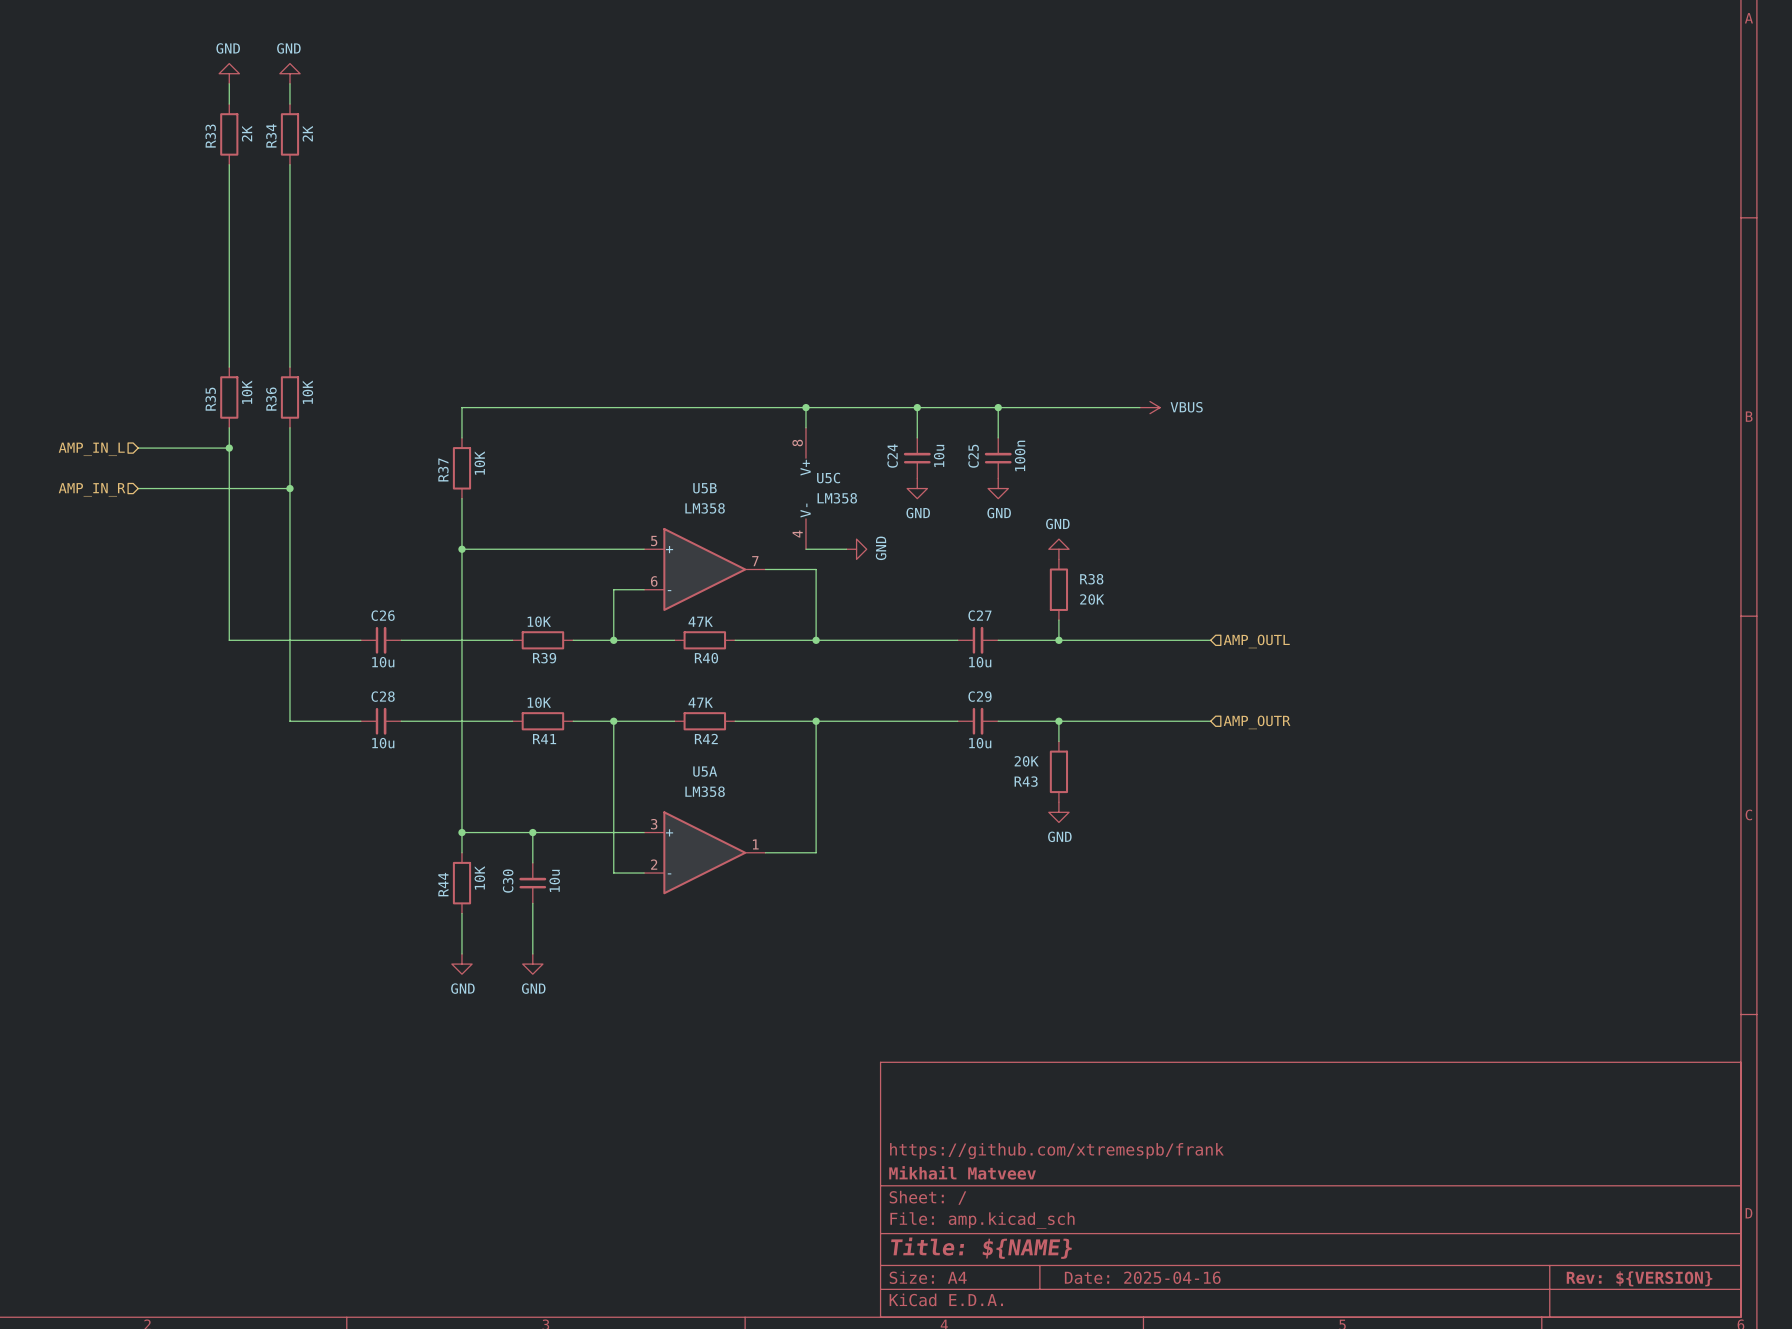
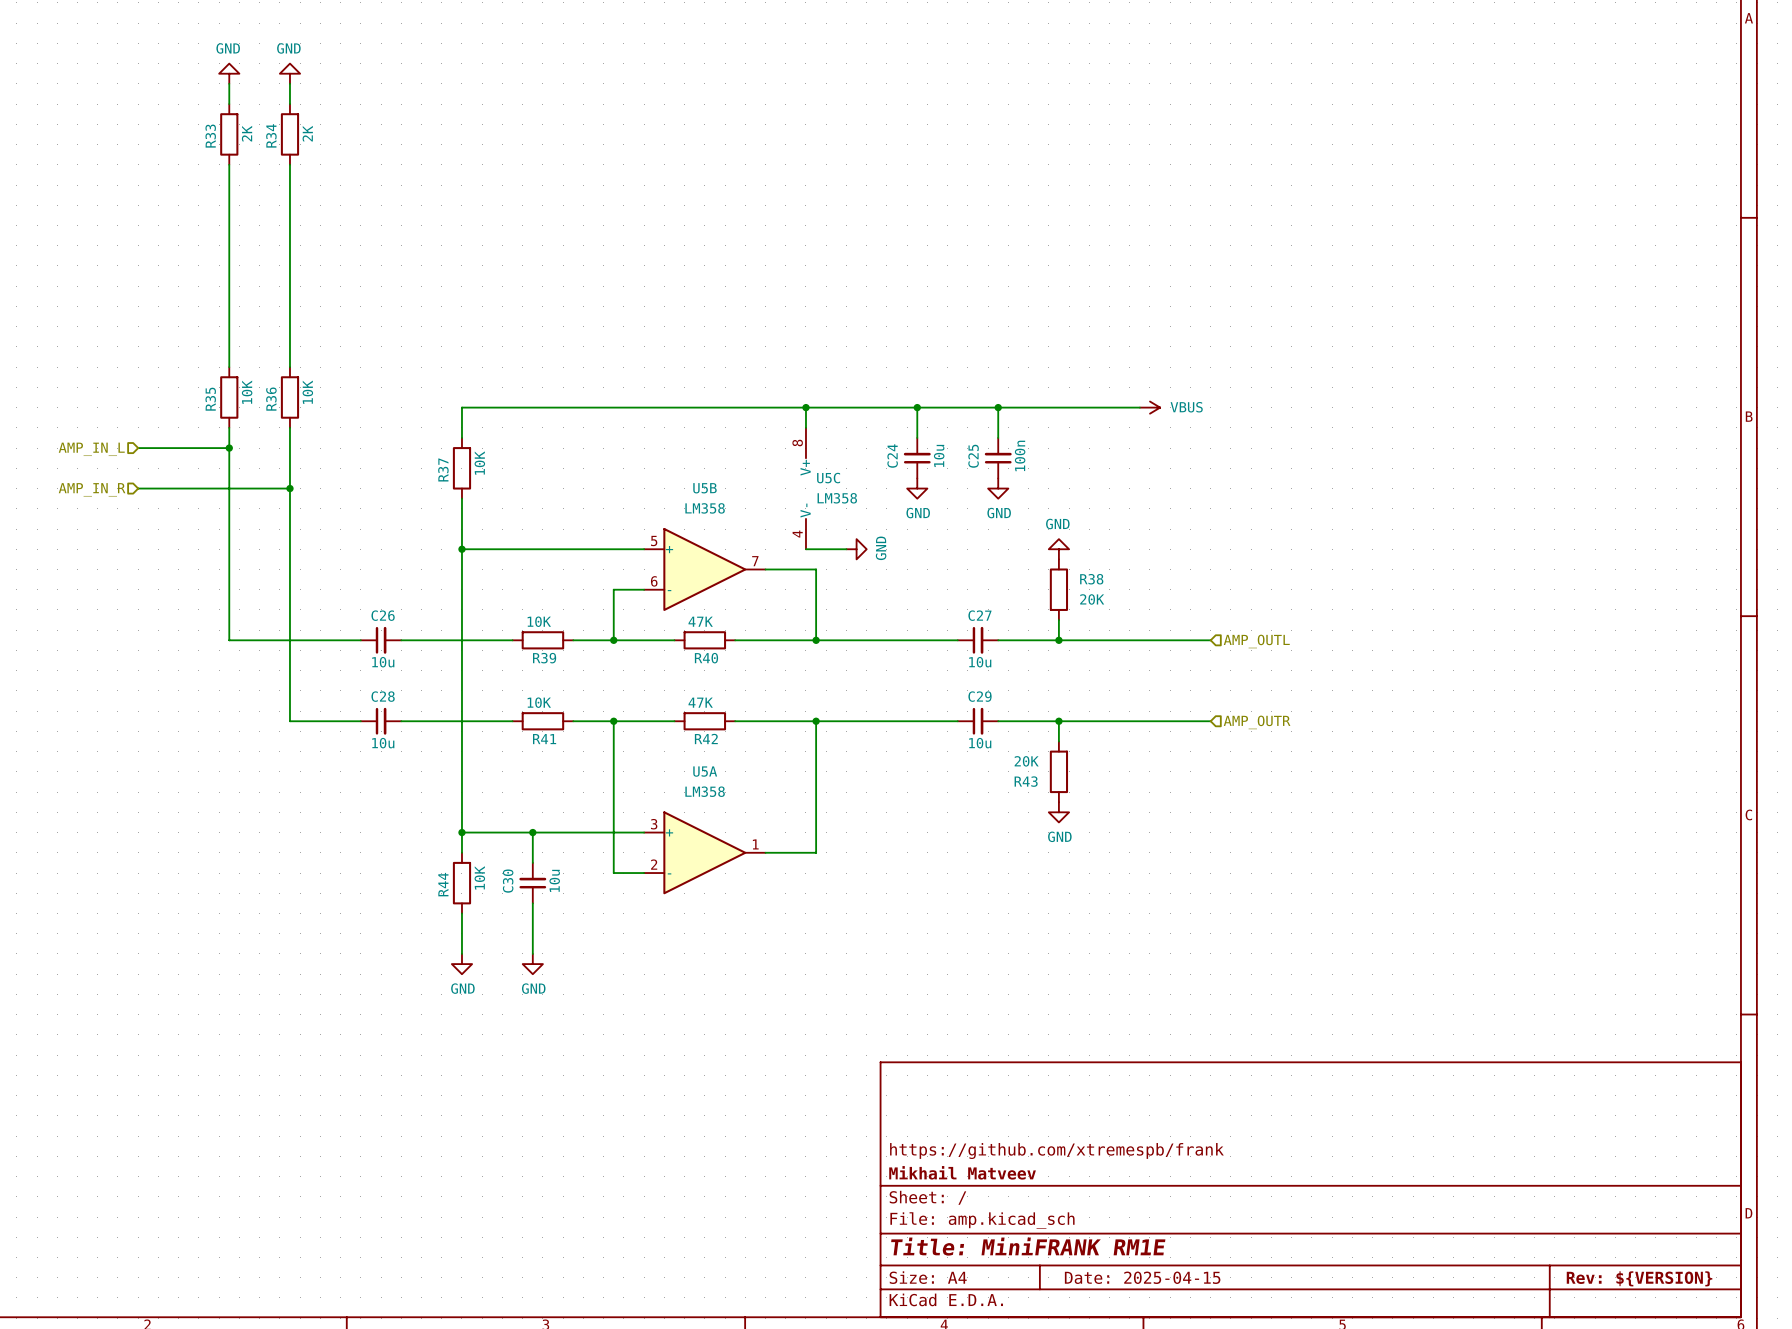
title block: Title: ${NAME} (981, 1248) -> Title: MiniFRANK RM1E (1028, 1246)
title block: Date: 2025-04-16 (1142, 1277) -> Date: 2025-04-15 (1142, 1277)

